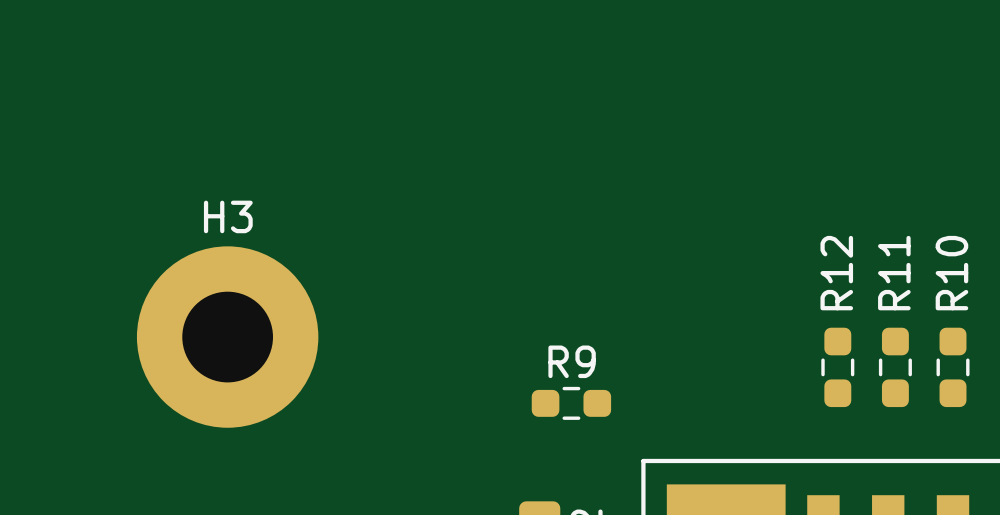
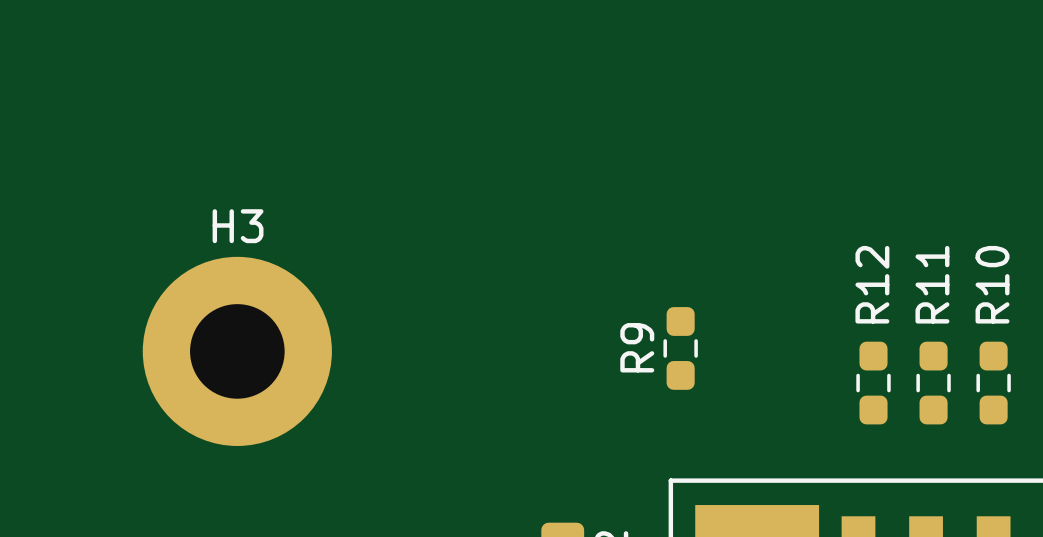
R9 name position: R9 (572, 361) -> R9 (637, 347)
R9 rotation: 0° (571, 403) -> 90° clockwise (680, 348)
R9 position: (571, 403) -> (680, 348)

